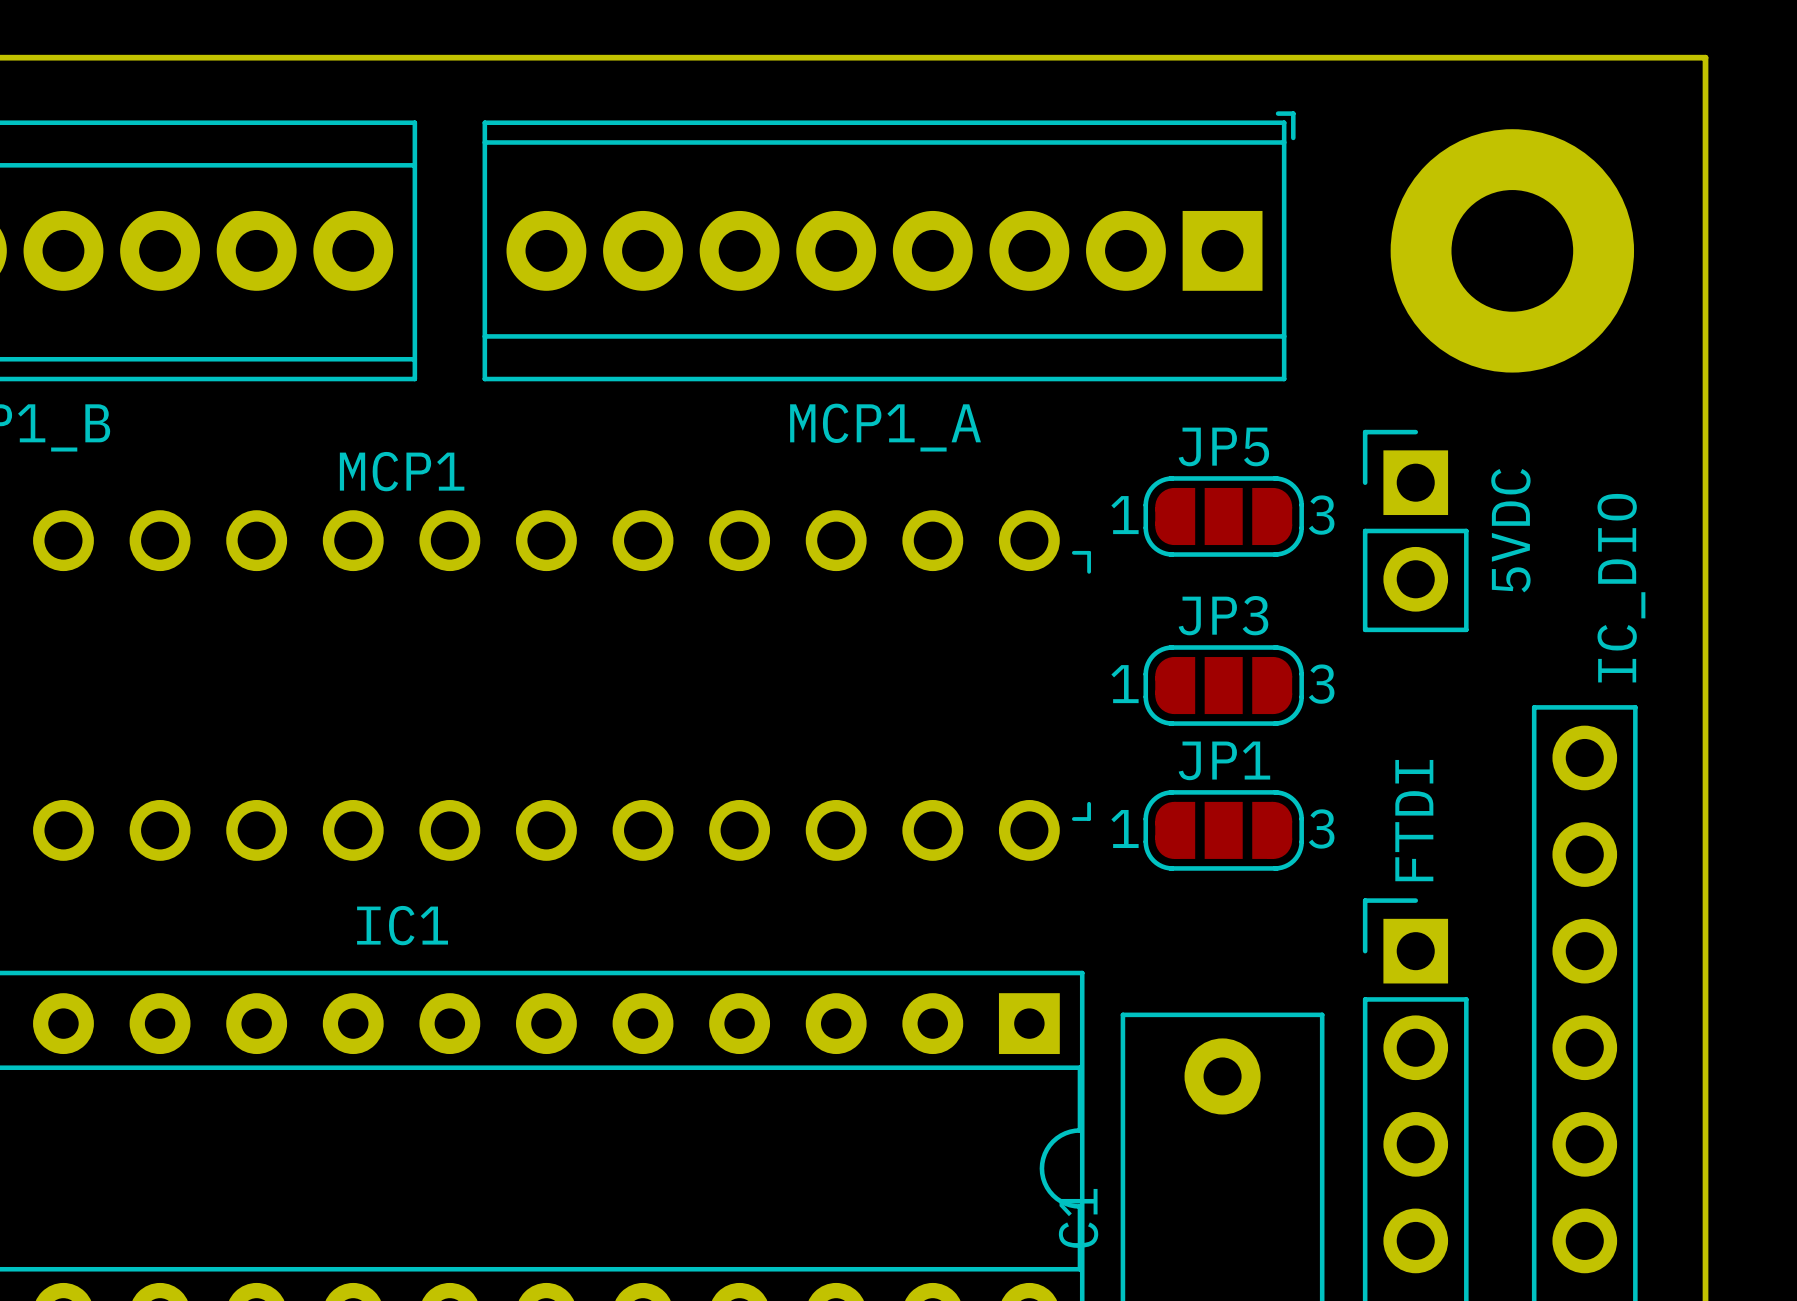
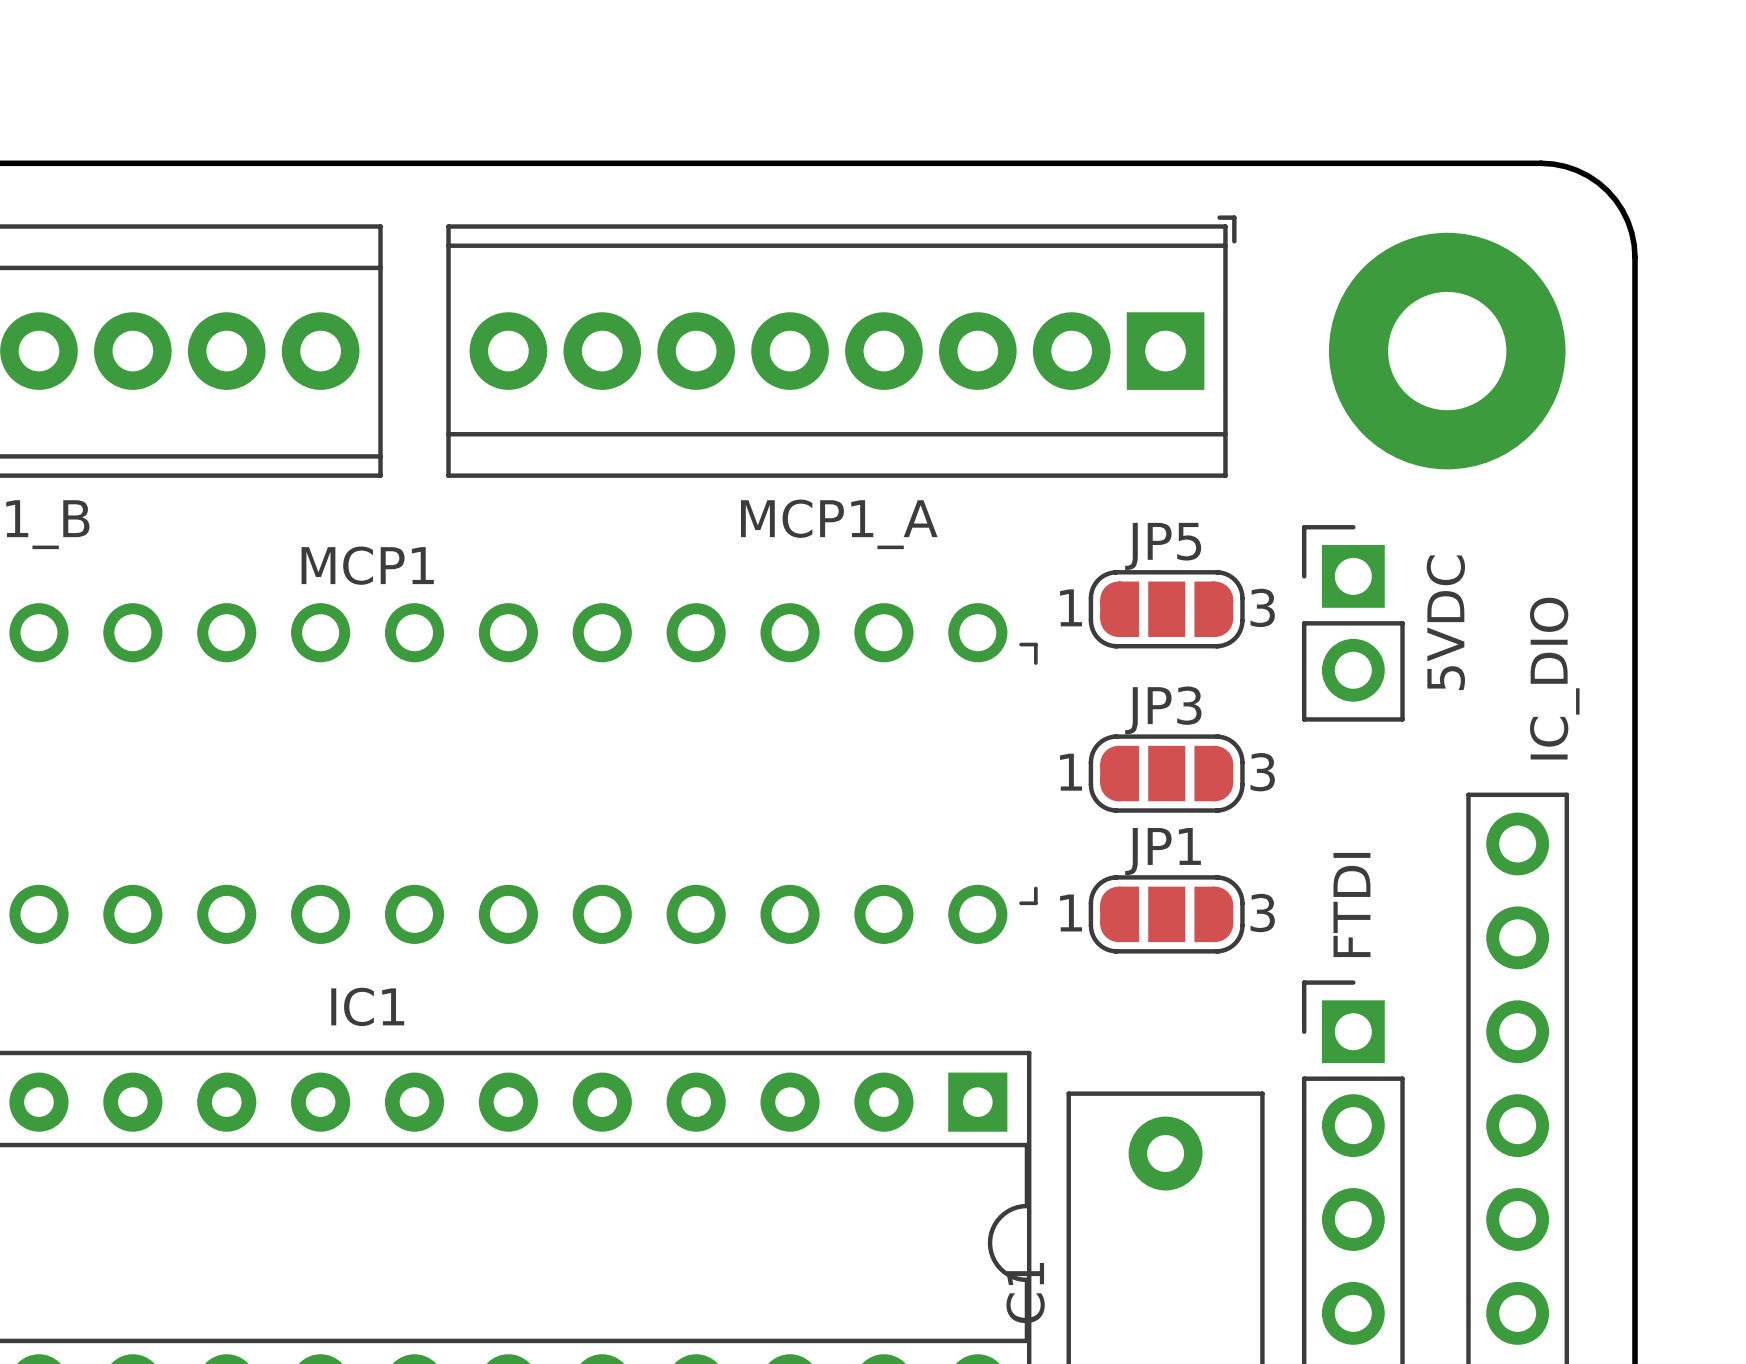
board edge: (1608, 57) (1705, 57) (1705, 154) -> (1541, 163) (1553, 164) (1577, 170) (1598, 182) (1607, 190) (1615, 200) (1627, 221) (1631, 232) (1635, 257)

